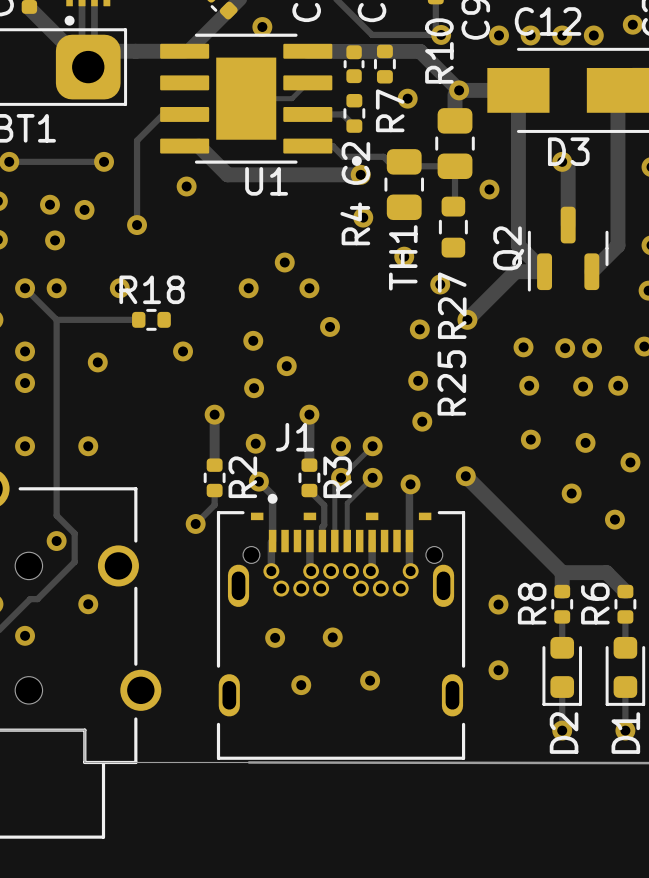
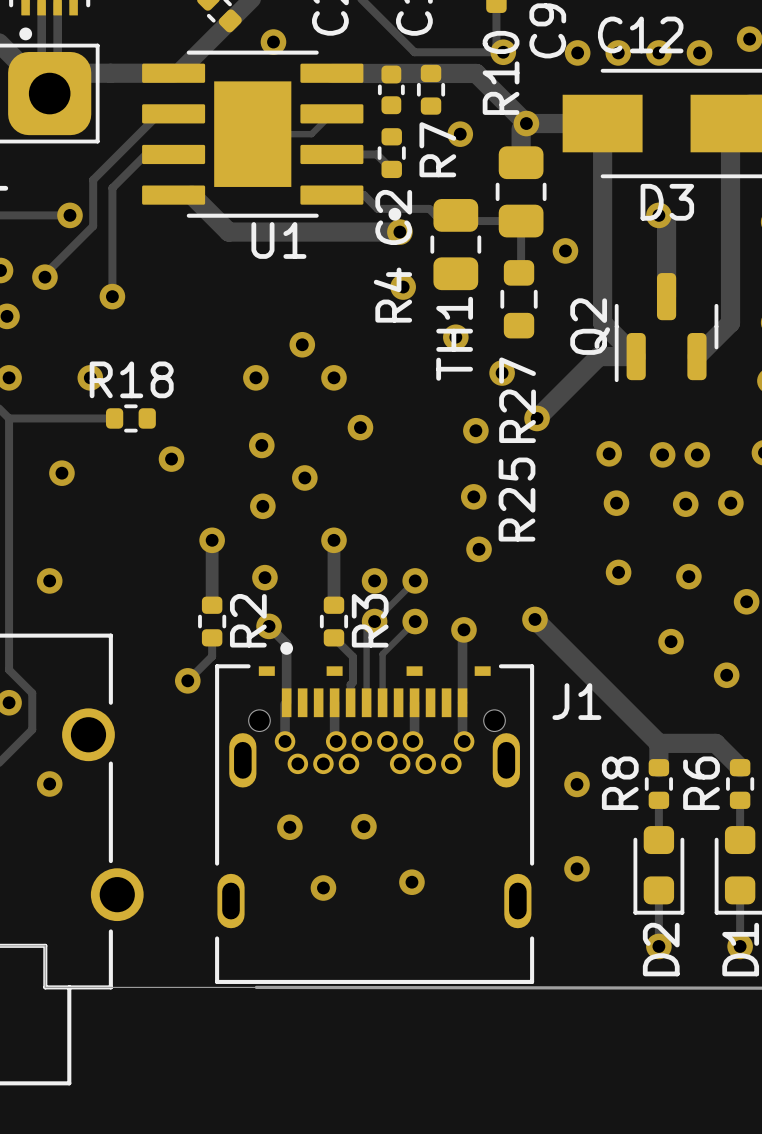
track: none -> (173, 113) (159, 113) (93, 179) (93, 226) (42, 276)
via: (186, 186) -> none
J1 name position: J1 (295, 437) -> J1 (576, 701)

